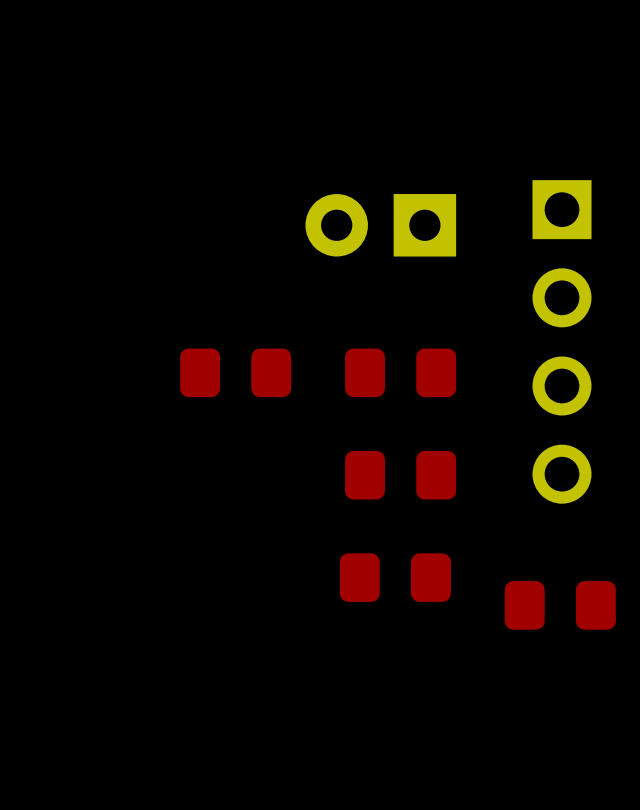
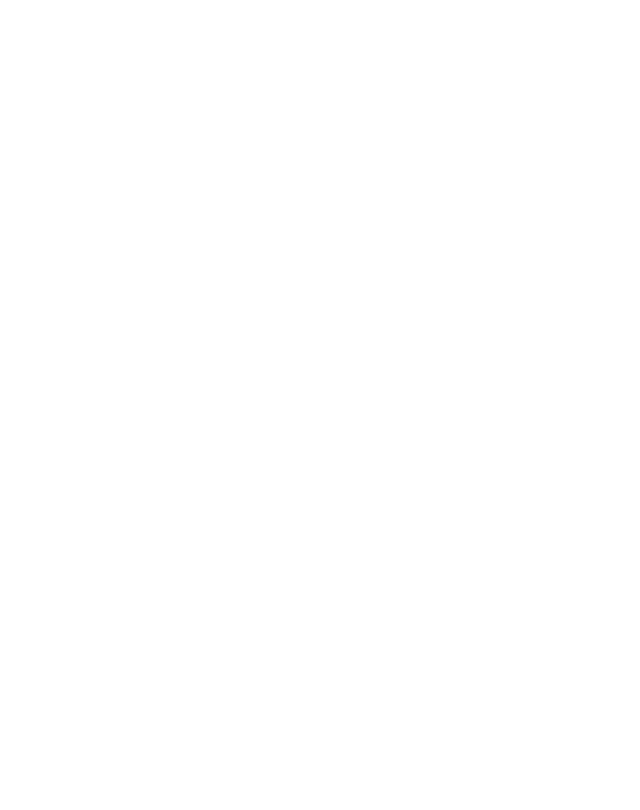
part: (380, 225) -> none
part: (562, 341) -> none
part: (235, 372) -> none
part: (400, 372) -> none
part: (400, 475) -> none
part: (395, 577) -> none
part: (560, 605) -> none

